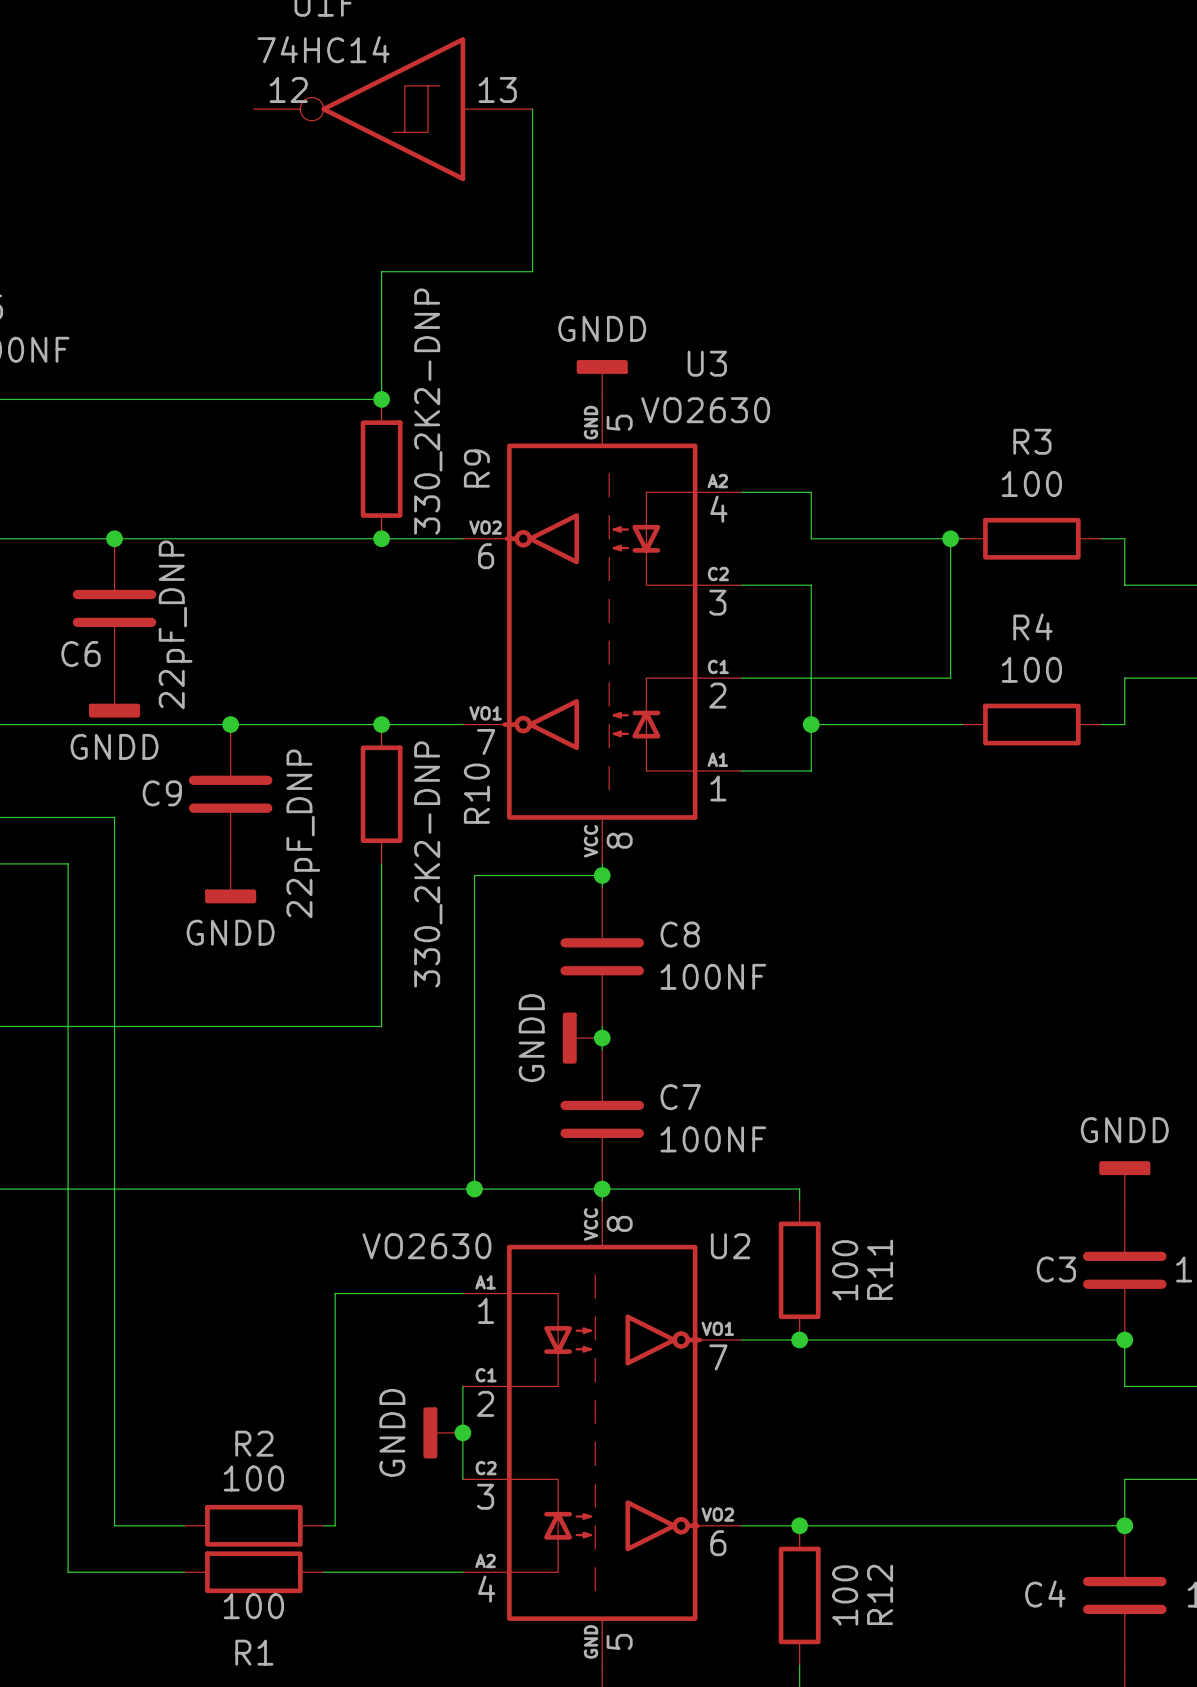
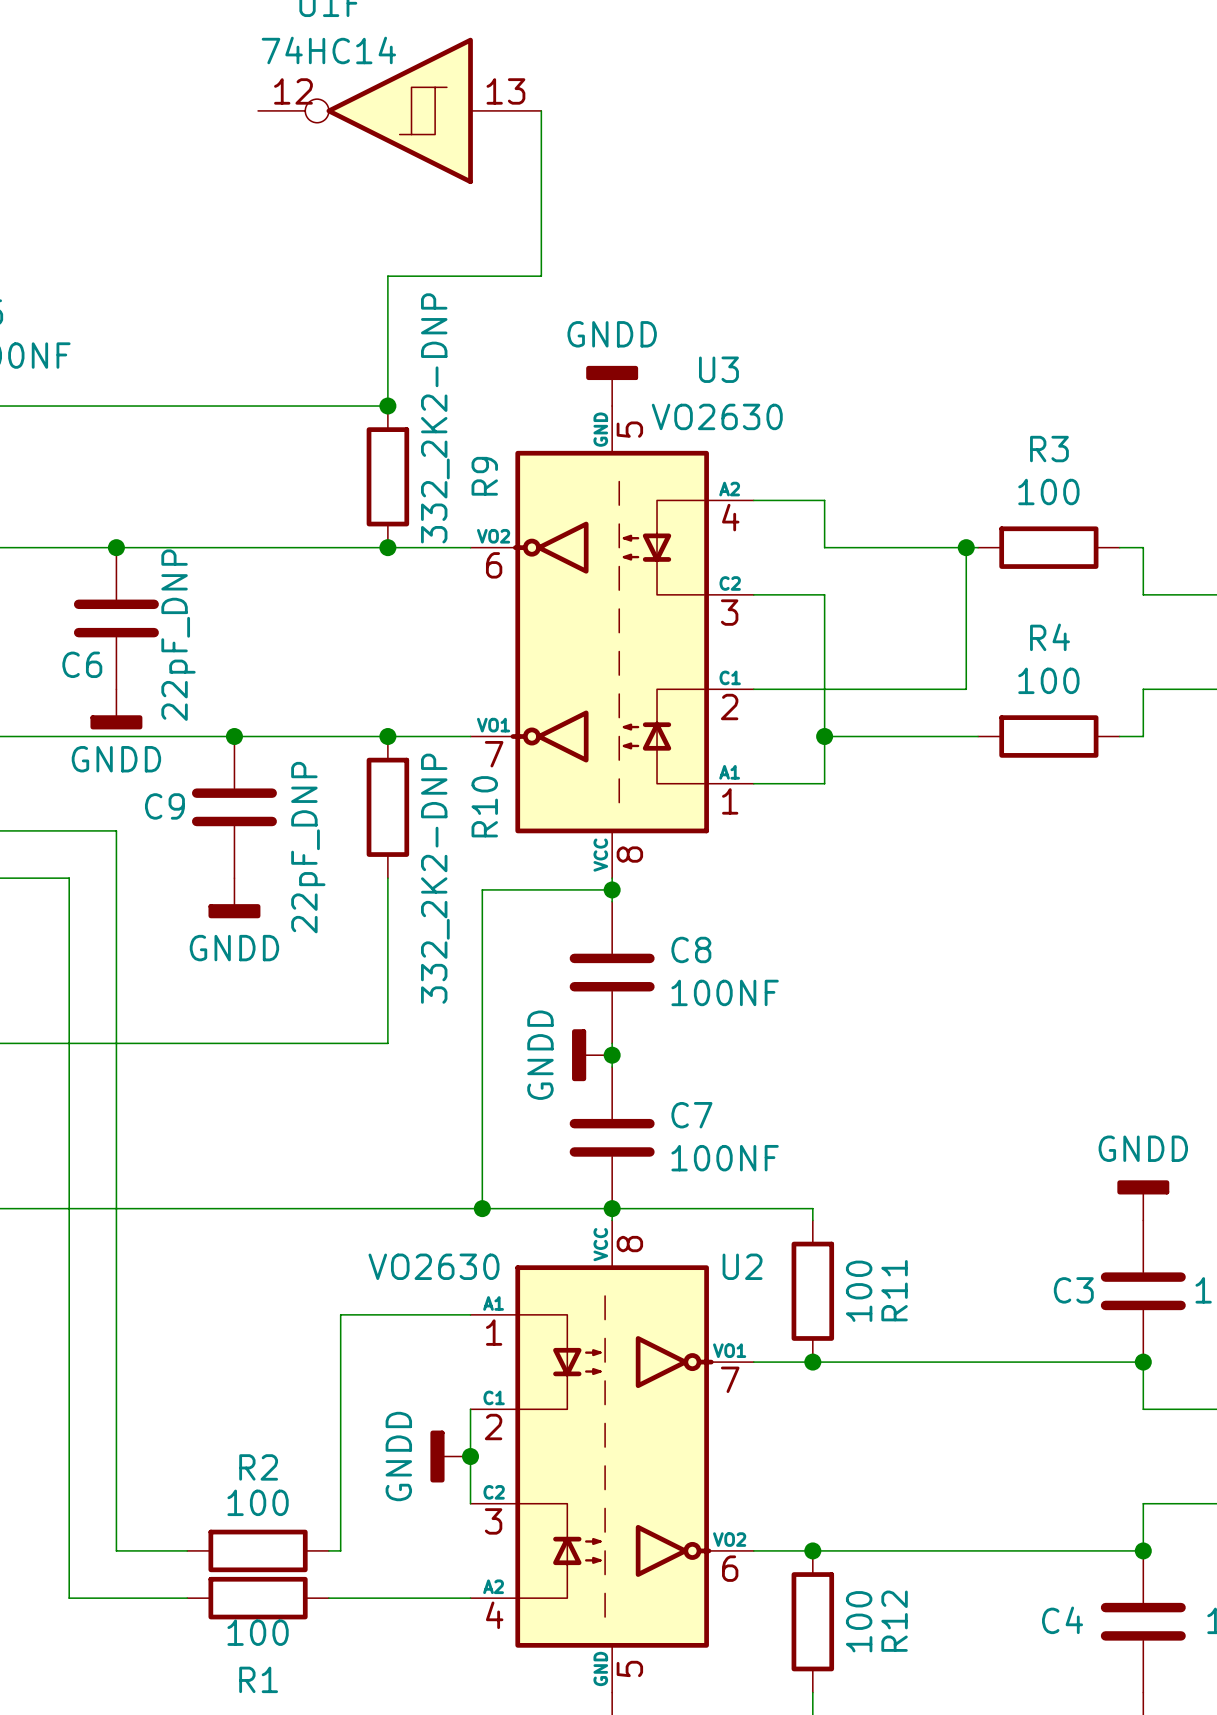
R9 value: 330_2K2-DNP (428, 411) -> 332_2K2-DNP (435, 418)
R10 value: 330_2K2-DNP (428, 864) -> 332_2K2-DNP (435, 878)

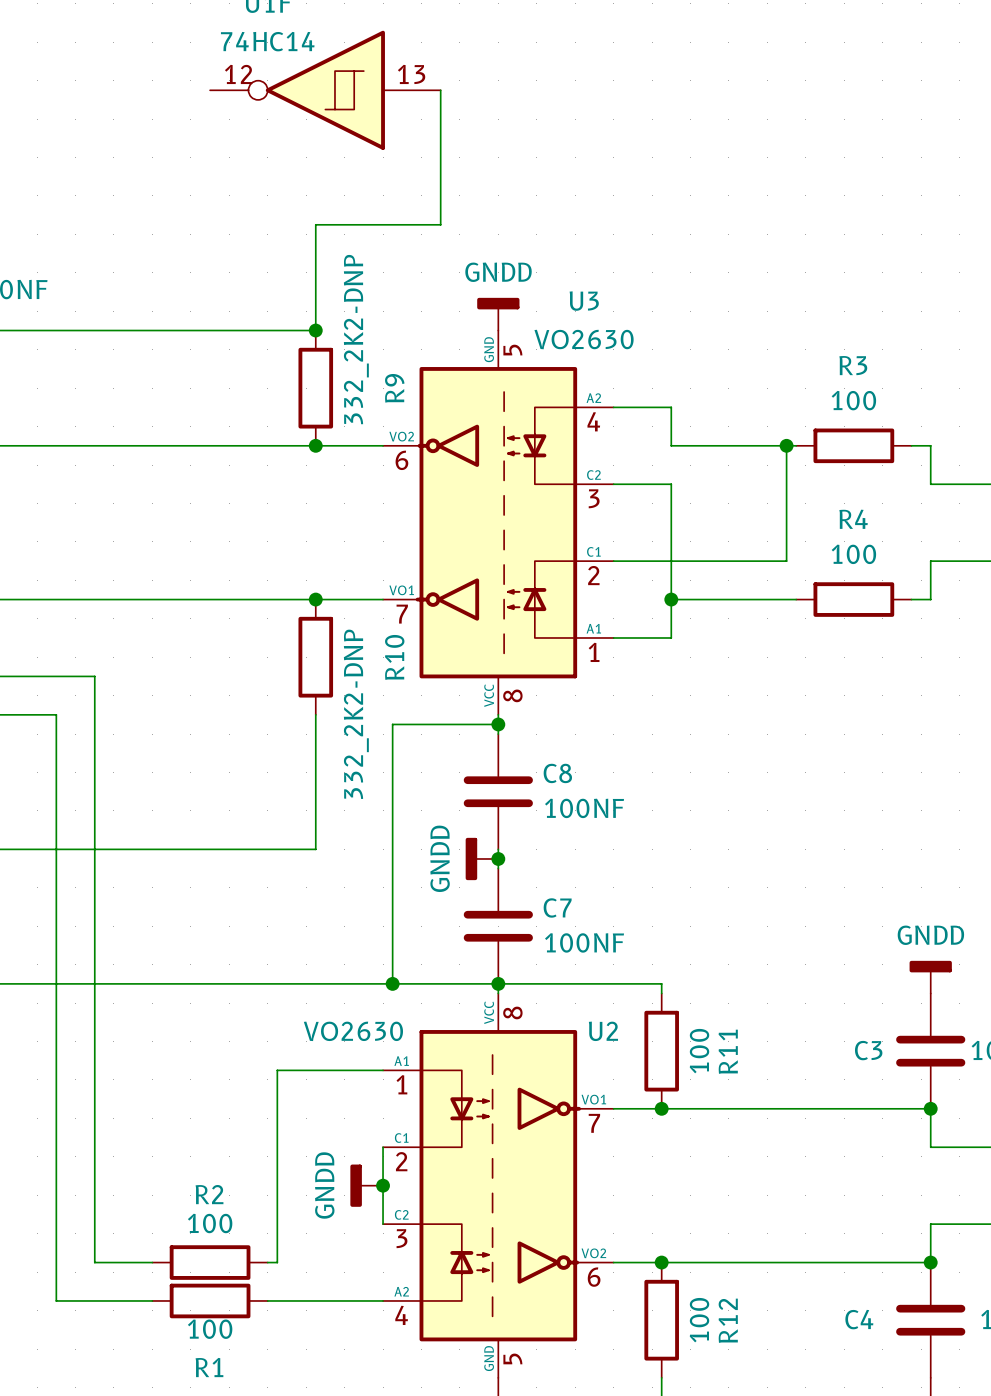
junction: (116, 547) -> none
C6: 22pF_DNP (116, 618) -> none
power symbol: GNDD (116, 709) -> none
junction: (234, 736) -> none
C9: 22pF_DNP (234, 807) -> none
power symbol: GNDD (234, 898) -> none

